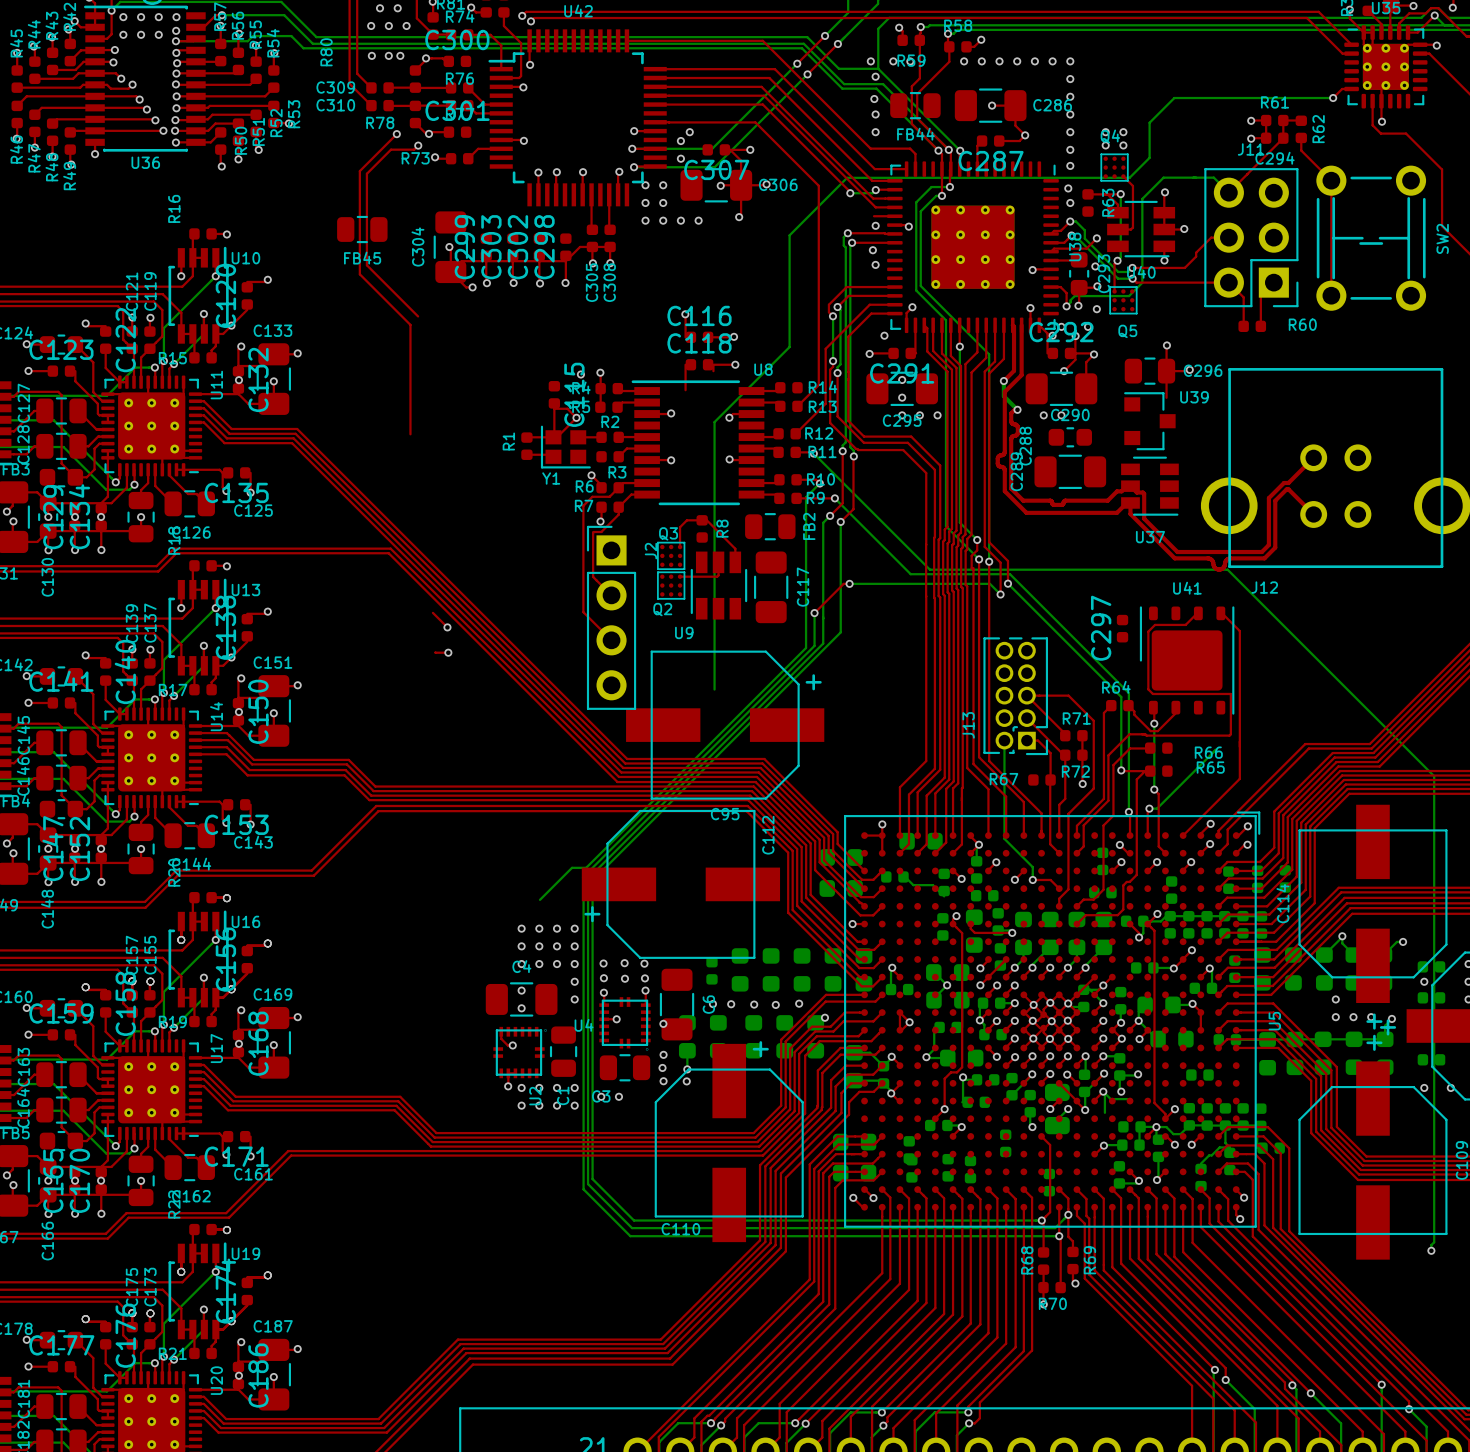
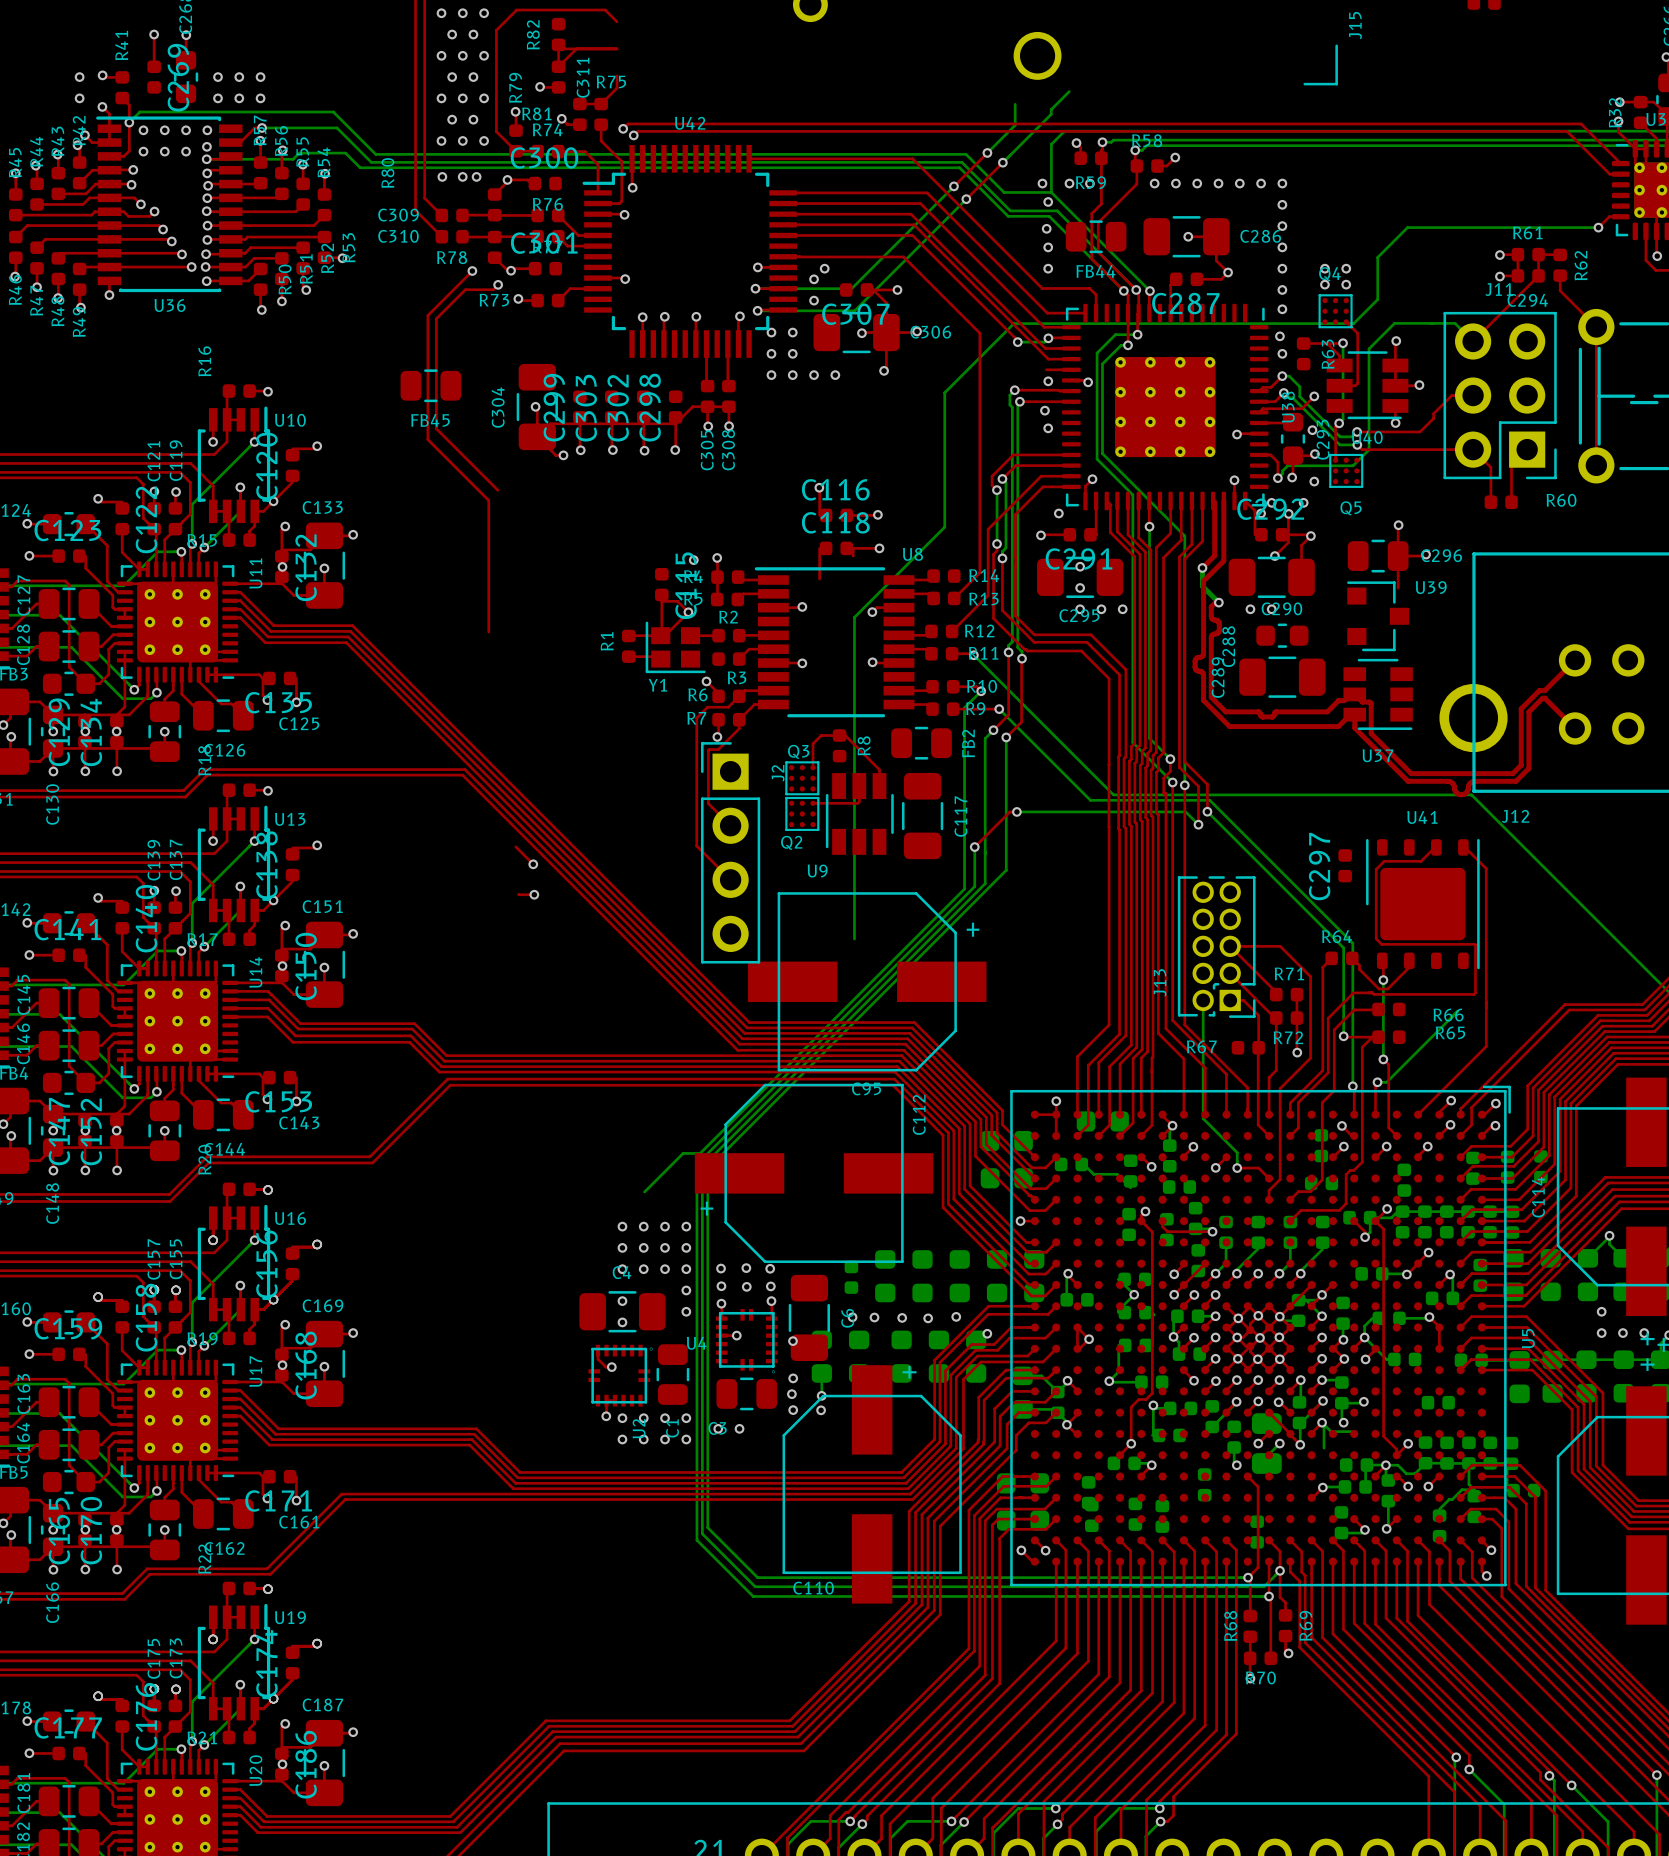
part footprint: [965, 909, 983, 953] -> [1160, 1212, 1174, 1247]
part footprint: [1015, 911, 1032, 956] -> [1219, 1215, 1233, 1249]
part footprint: [1041, 911, 1059, 956] -> [1251, 1215, 1266, 1249]
part footprint: [1068, 911, 1086, 956] -> [1283, 1215, 1298, 1249]
part footprint: [1095, 911, 1113, 956] -> [1315, 1215, 1330, 1249]
part footprint: [926, 964, 970, 981] -> [1118, 1272, 1152, 1287]
part footprint: [926, 991, 970, 1009] -> [1118, 1305, 1152, 1320]
part footprint: [1137, 996, 1181, 1014] -> [1372, 1311, 1406, 1326]
part footprint: [1150, 1030, 1194, 1048] -> [1388, 1352, 1422, 1367]
part footprint: [940, 1049, 984, 1067] -> [1135, 1375, 1169, 1390]

